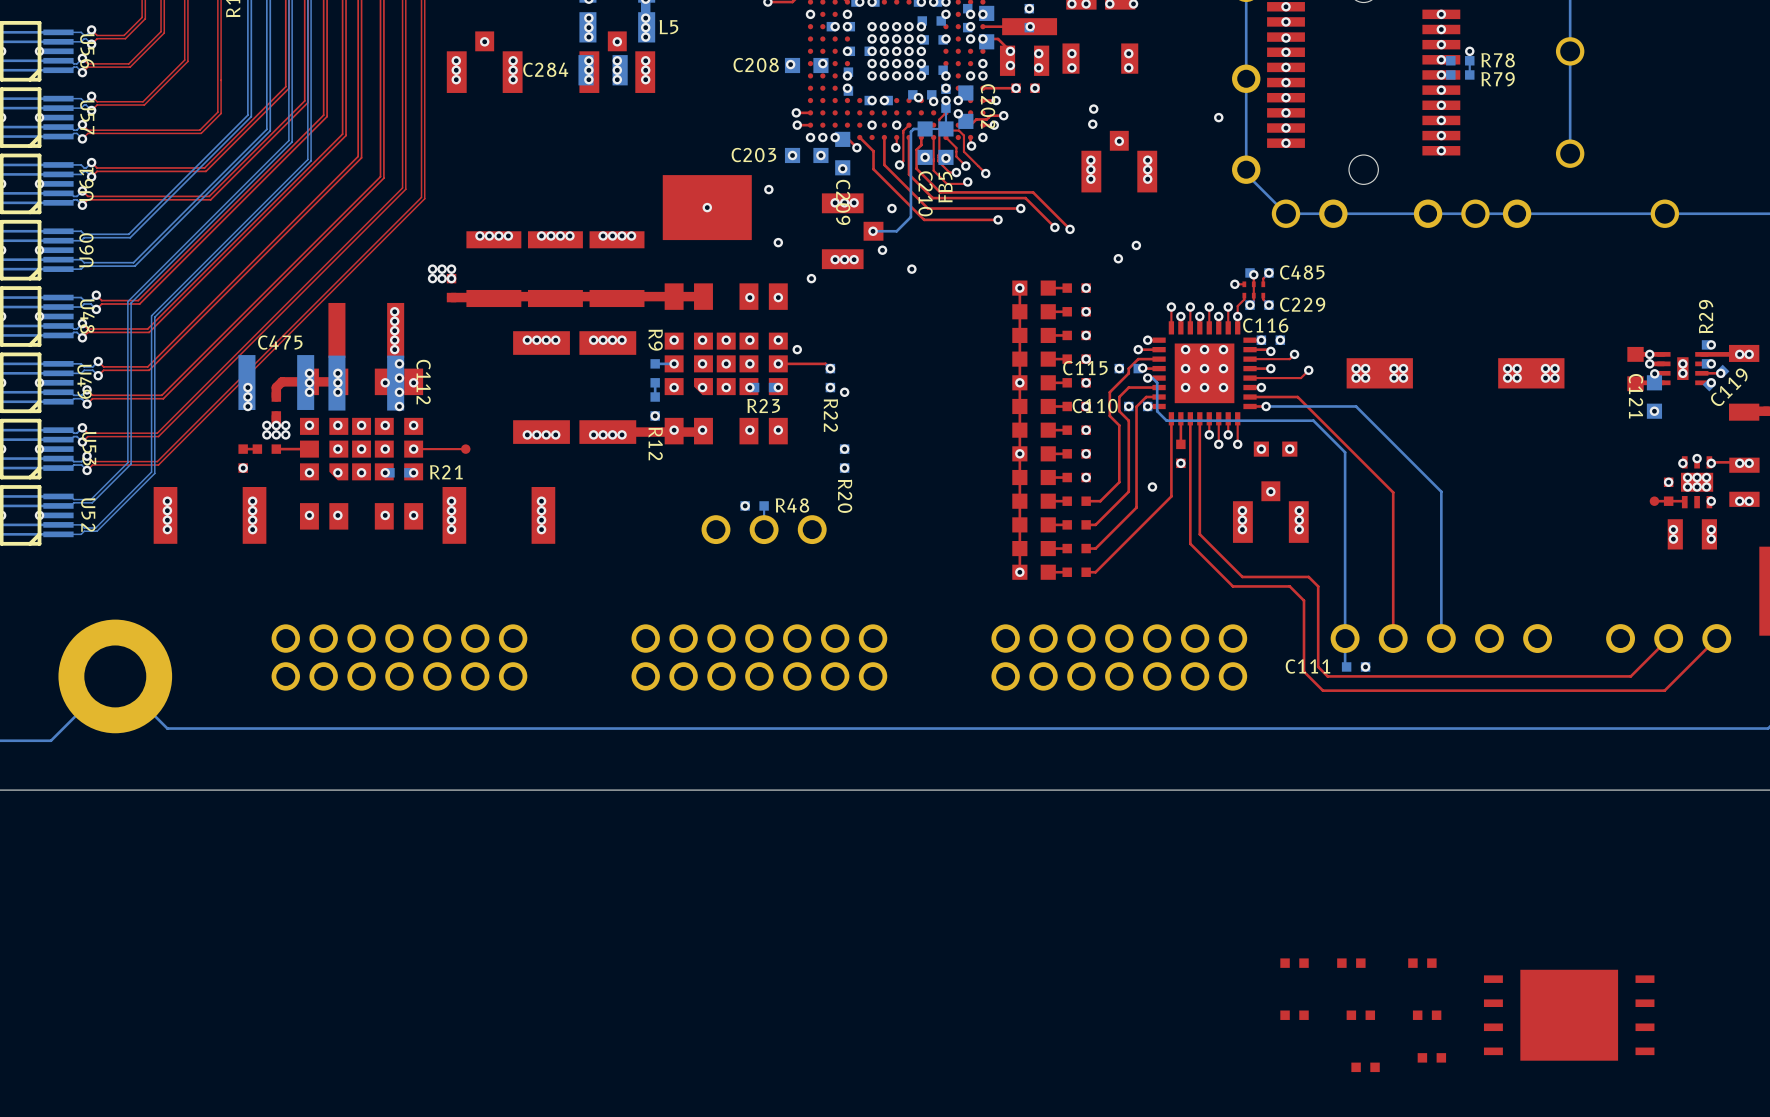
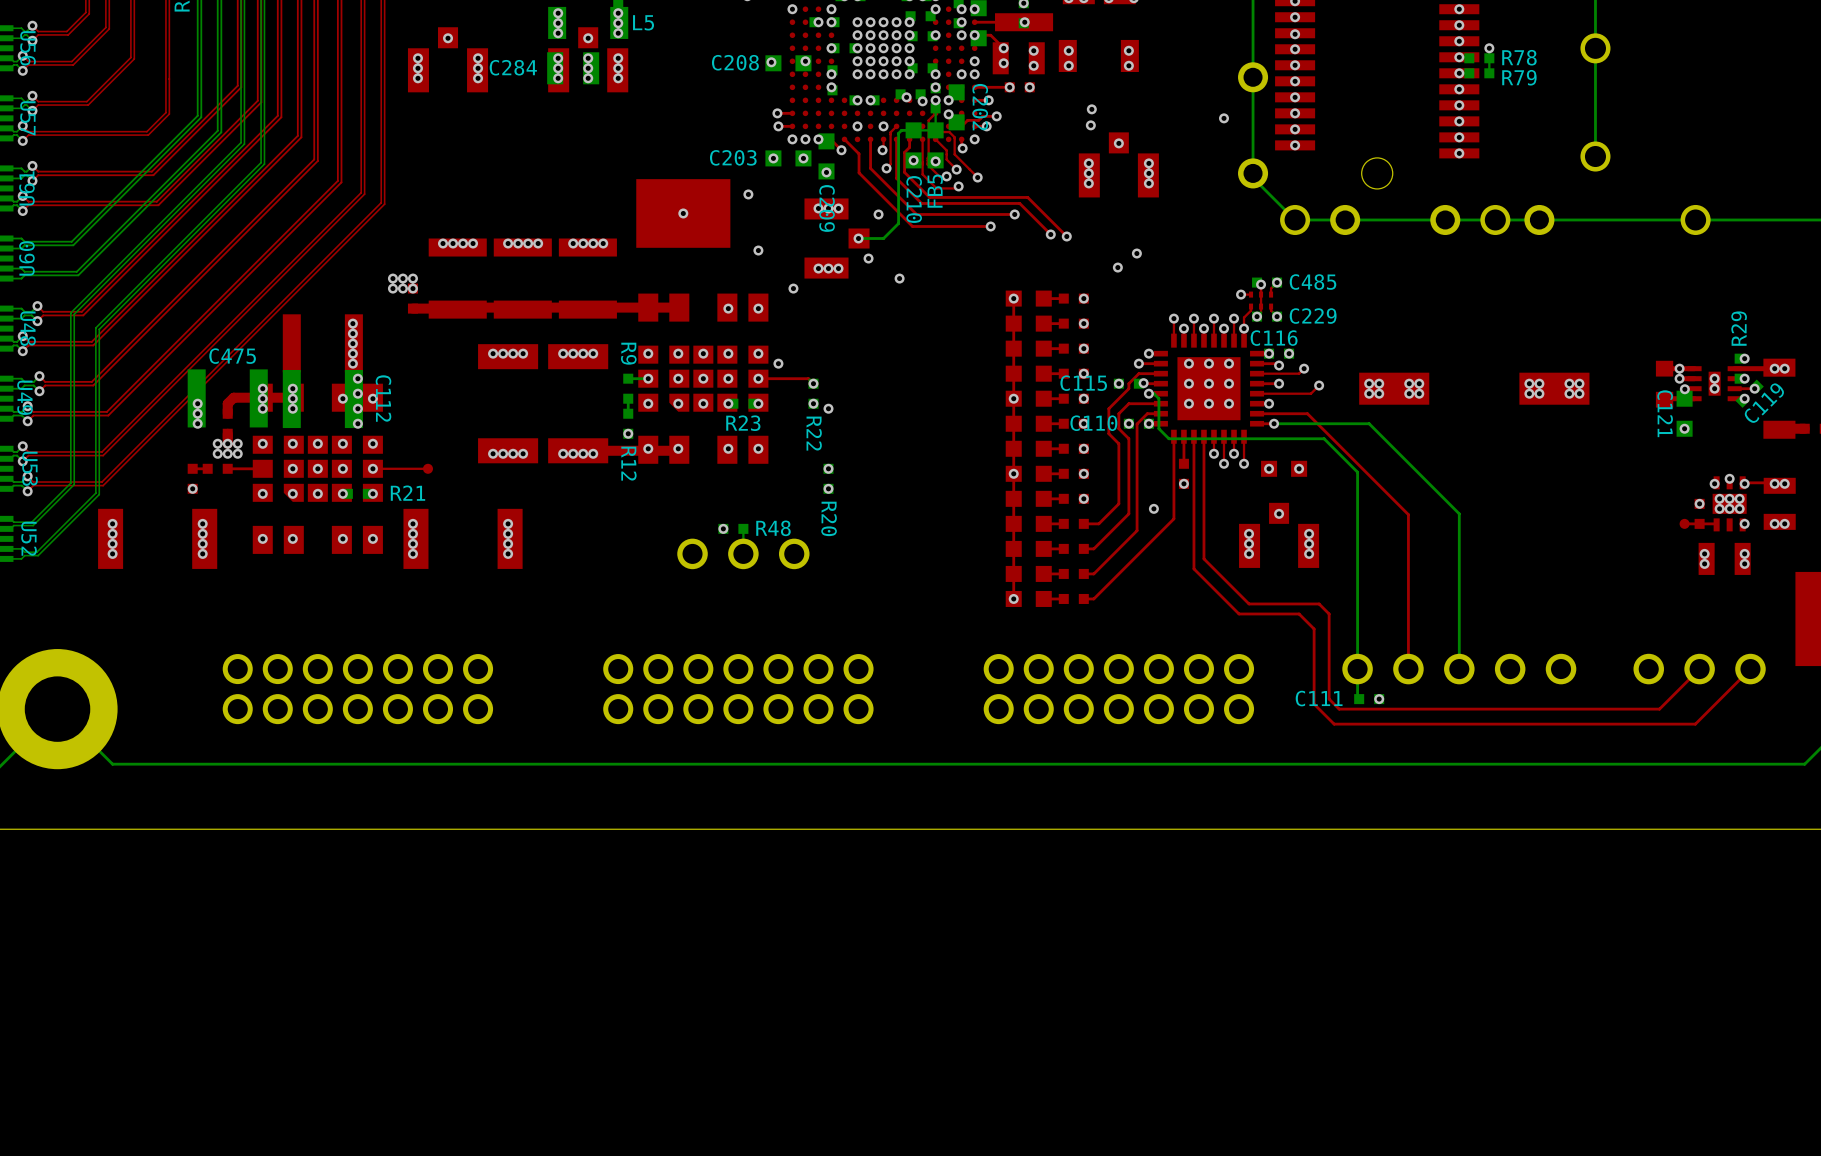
part: (1294, 963) -> none
part: (1351, 963) -> none
part: (1422, 963) -> none
part: (1294, 1015) -> none
part: (1360, 1015) -> none
part: (1427, 1015) -> none
part: (1569, 1015) -> none
part: (1431, 1057) -> none
part: (1365, 1067) -> none

